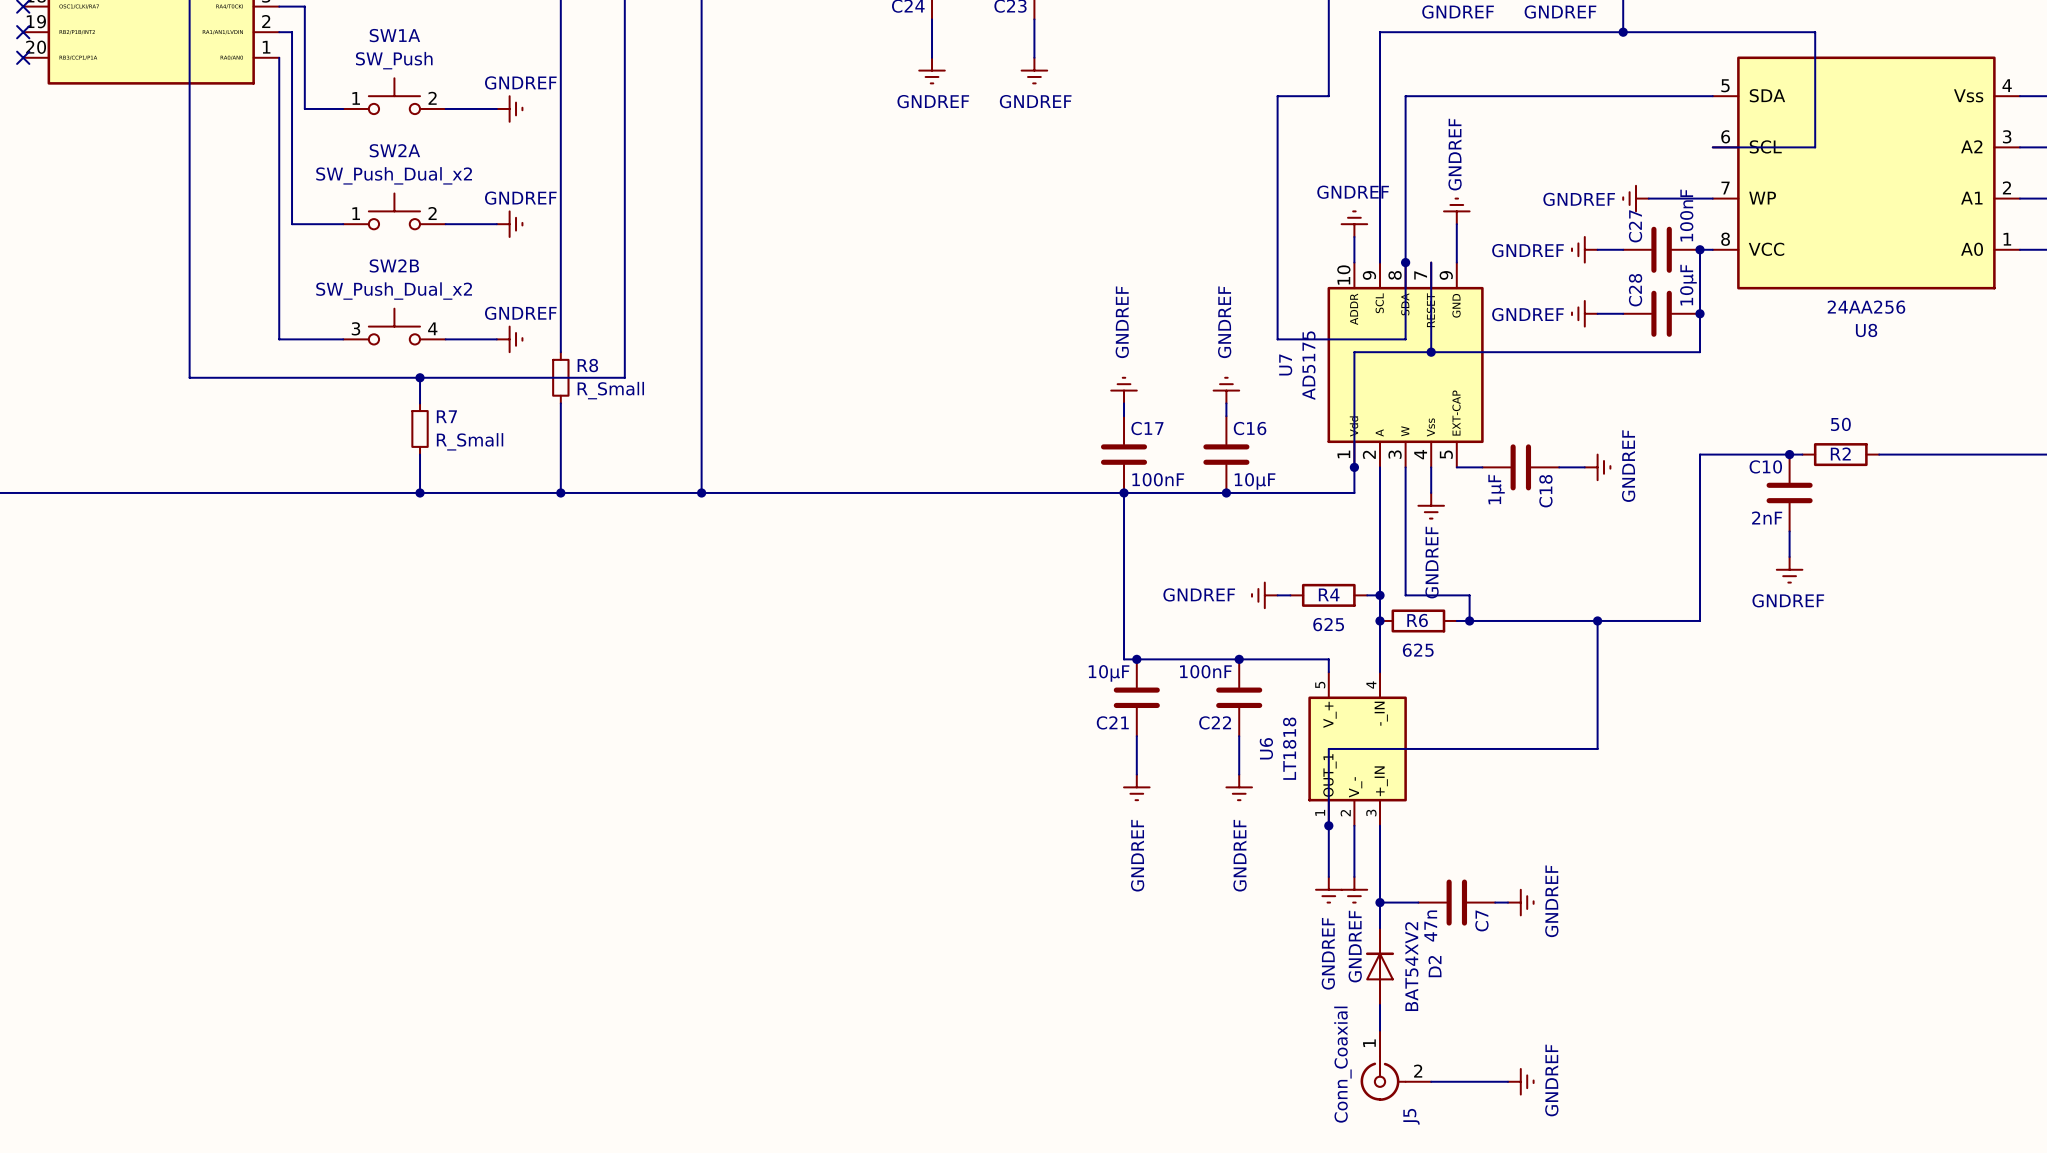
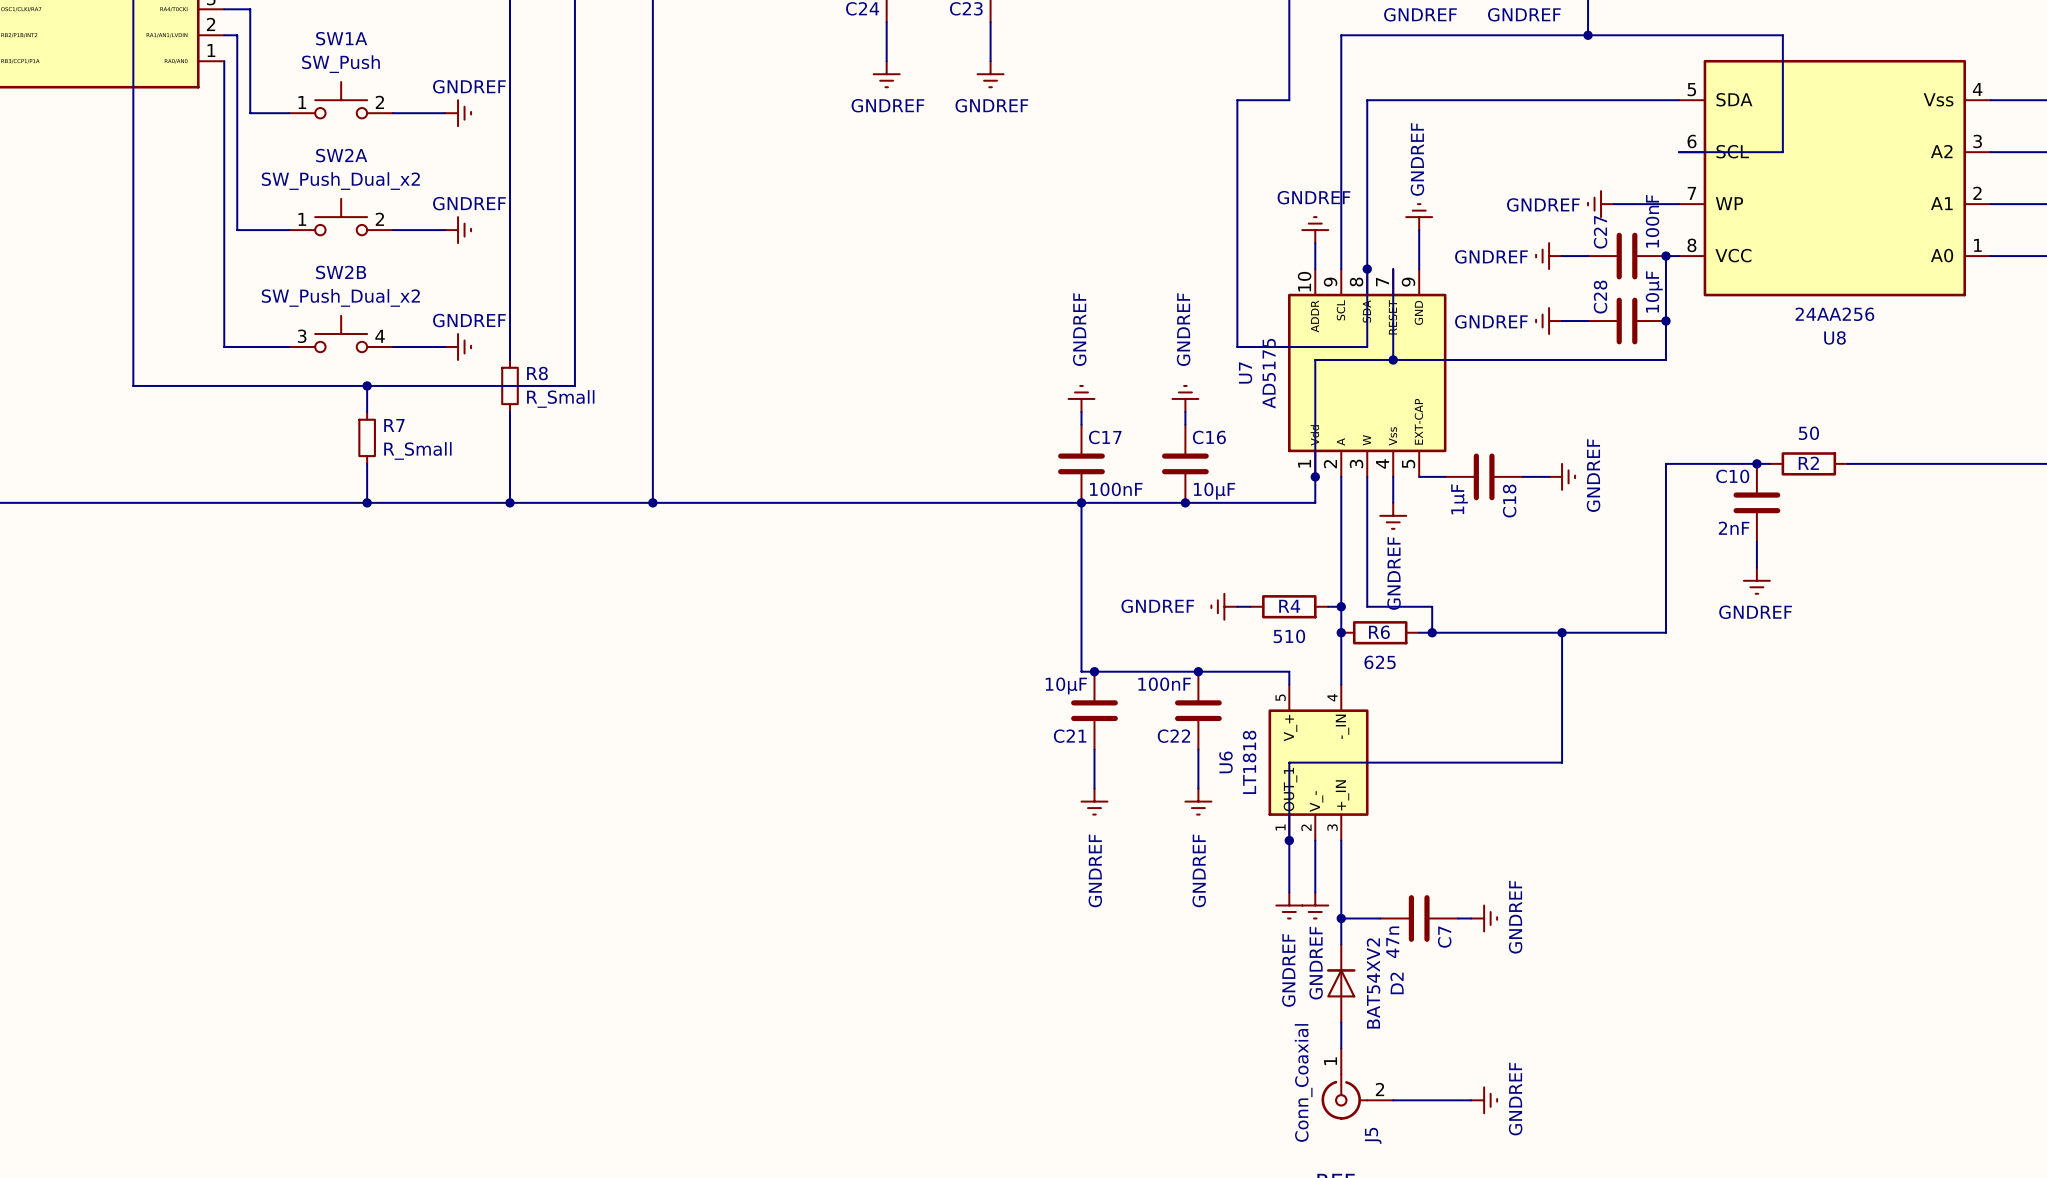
R4 value: 625 (1328, 624) -> 510 (1289, 636)

